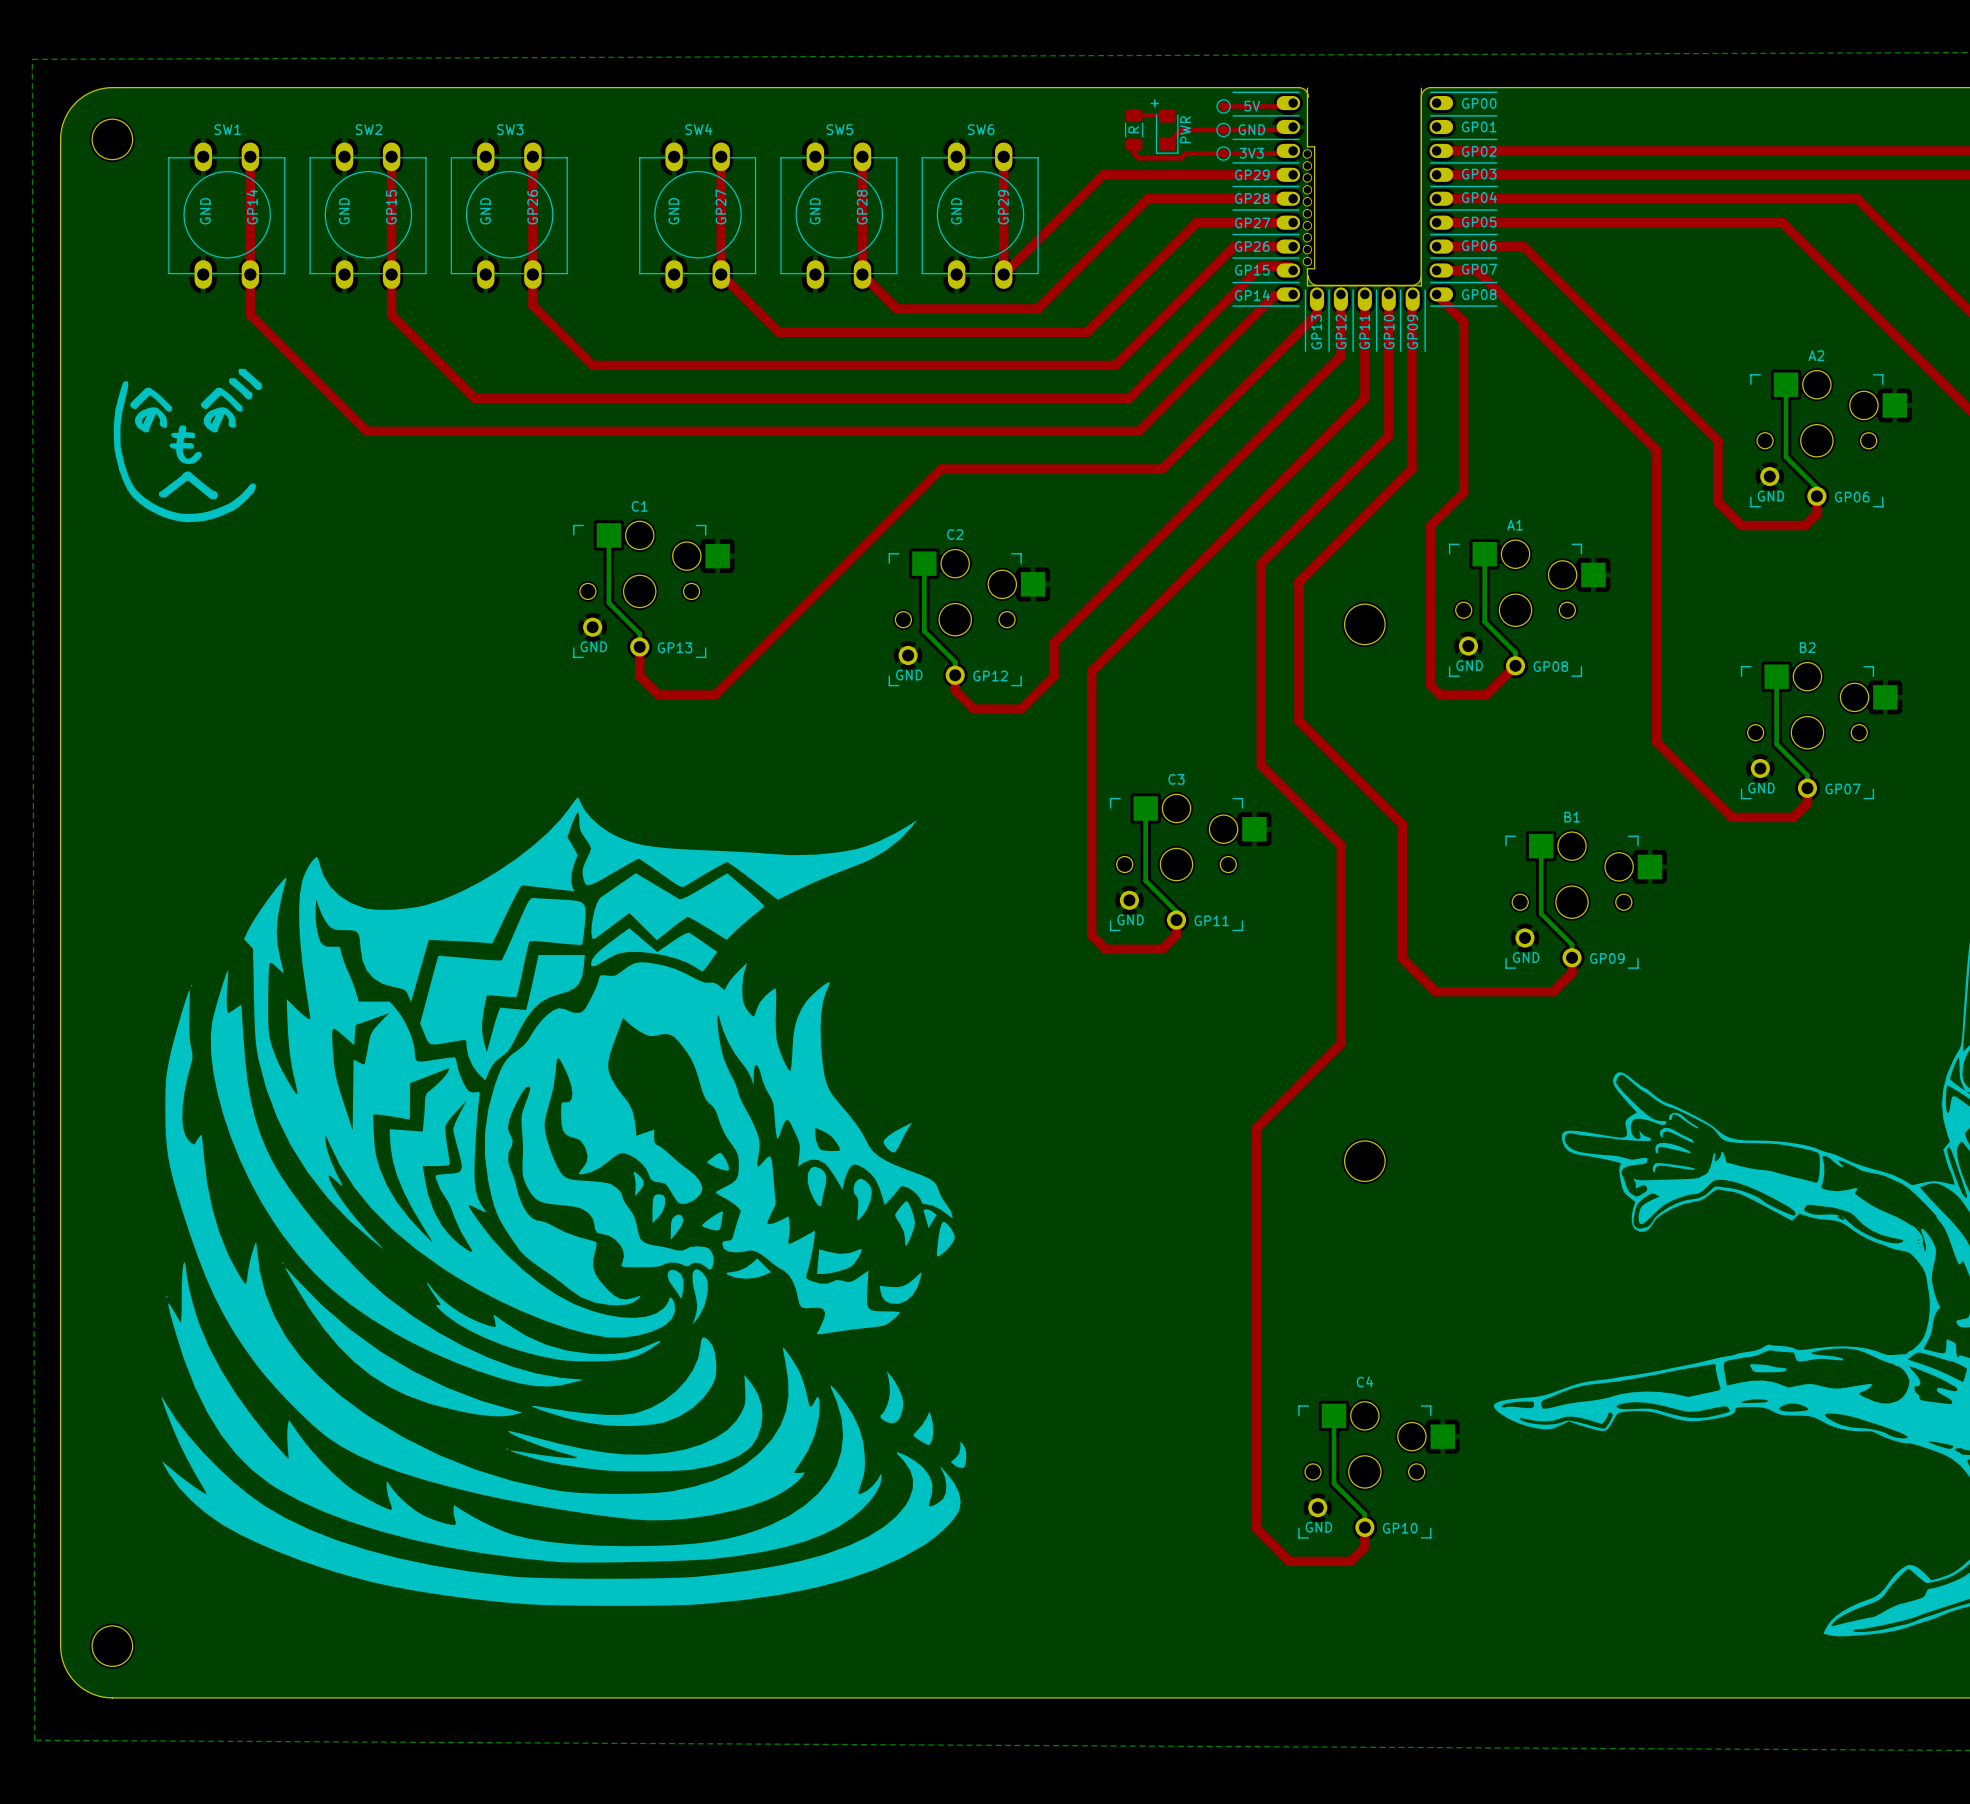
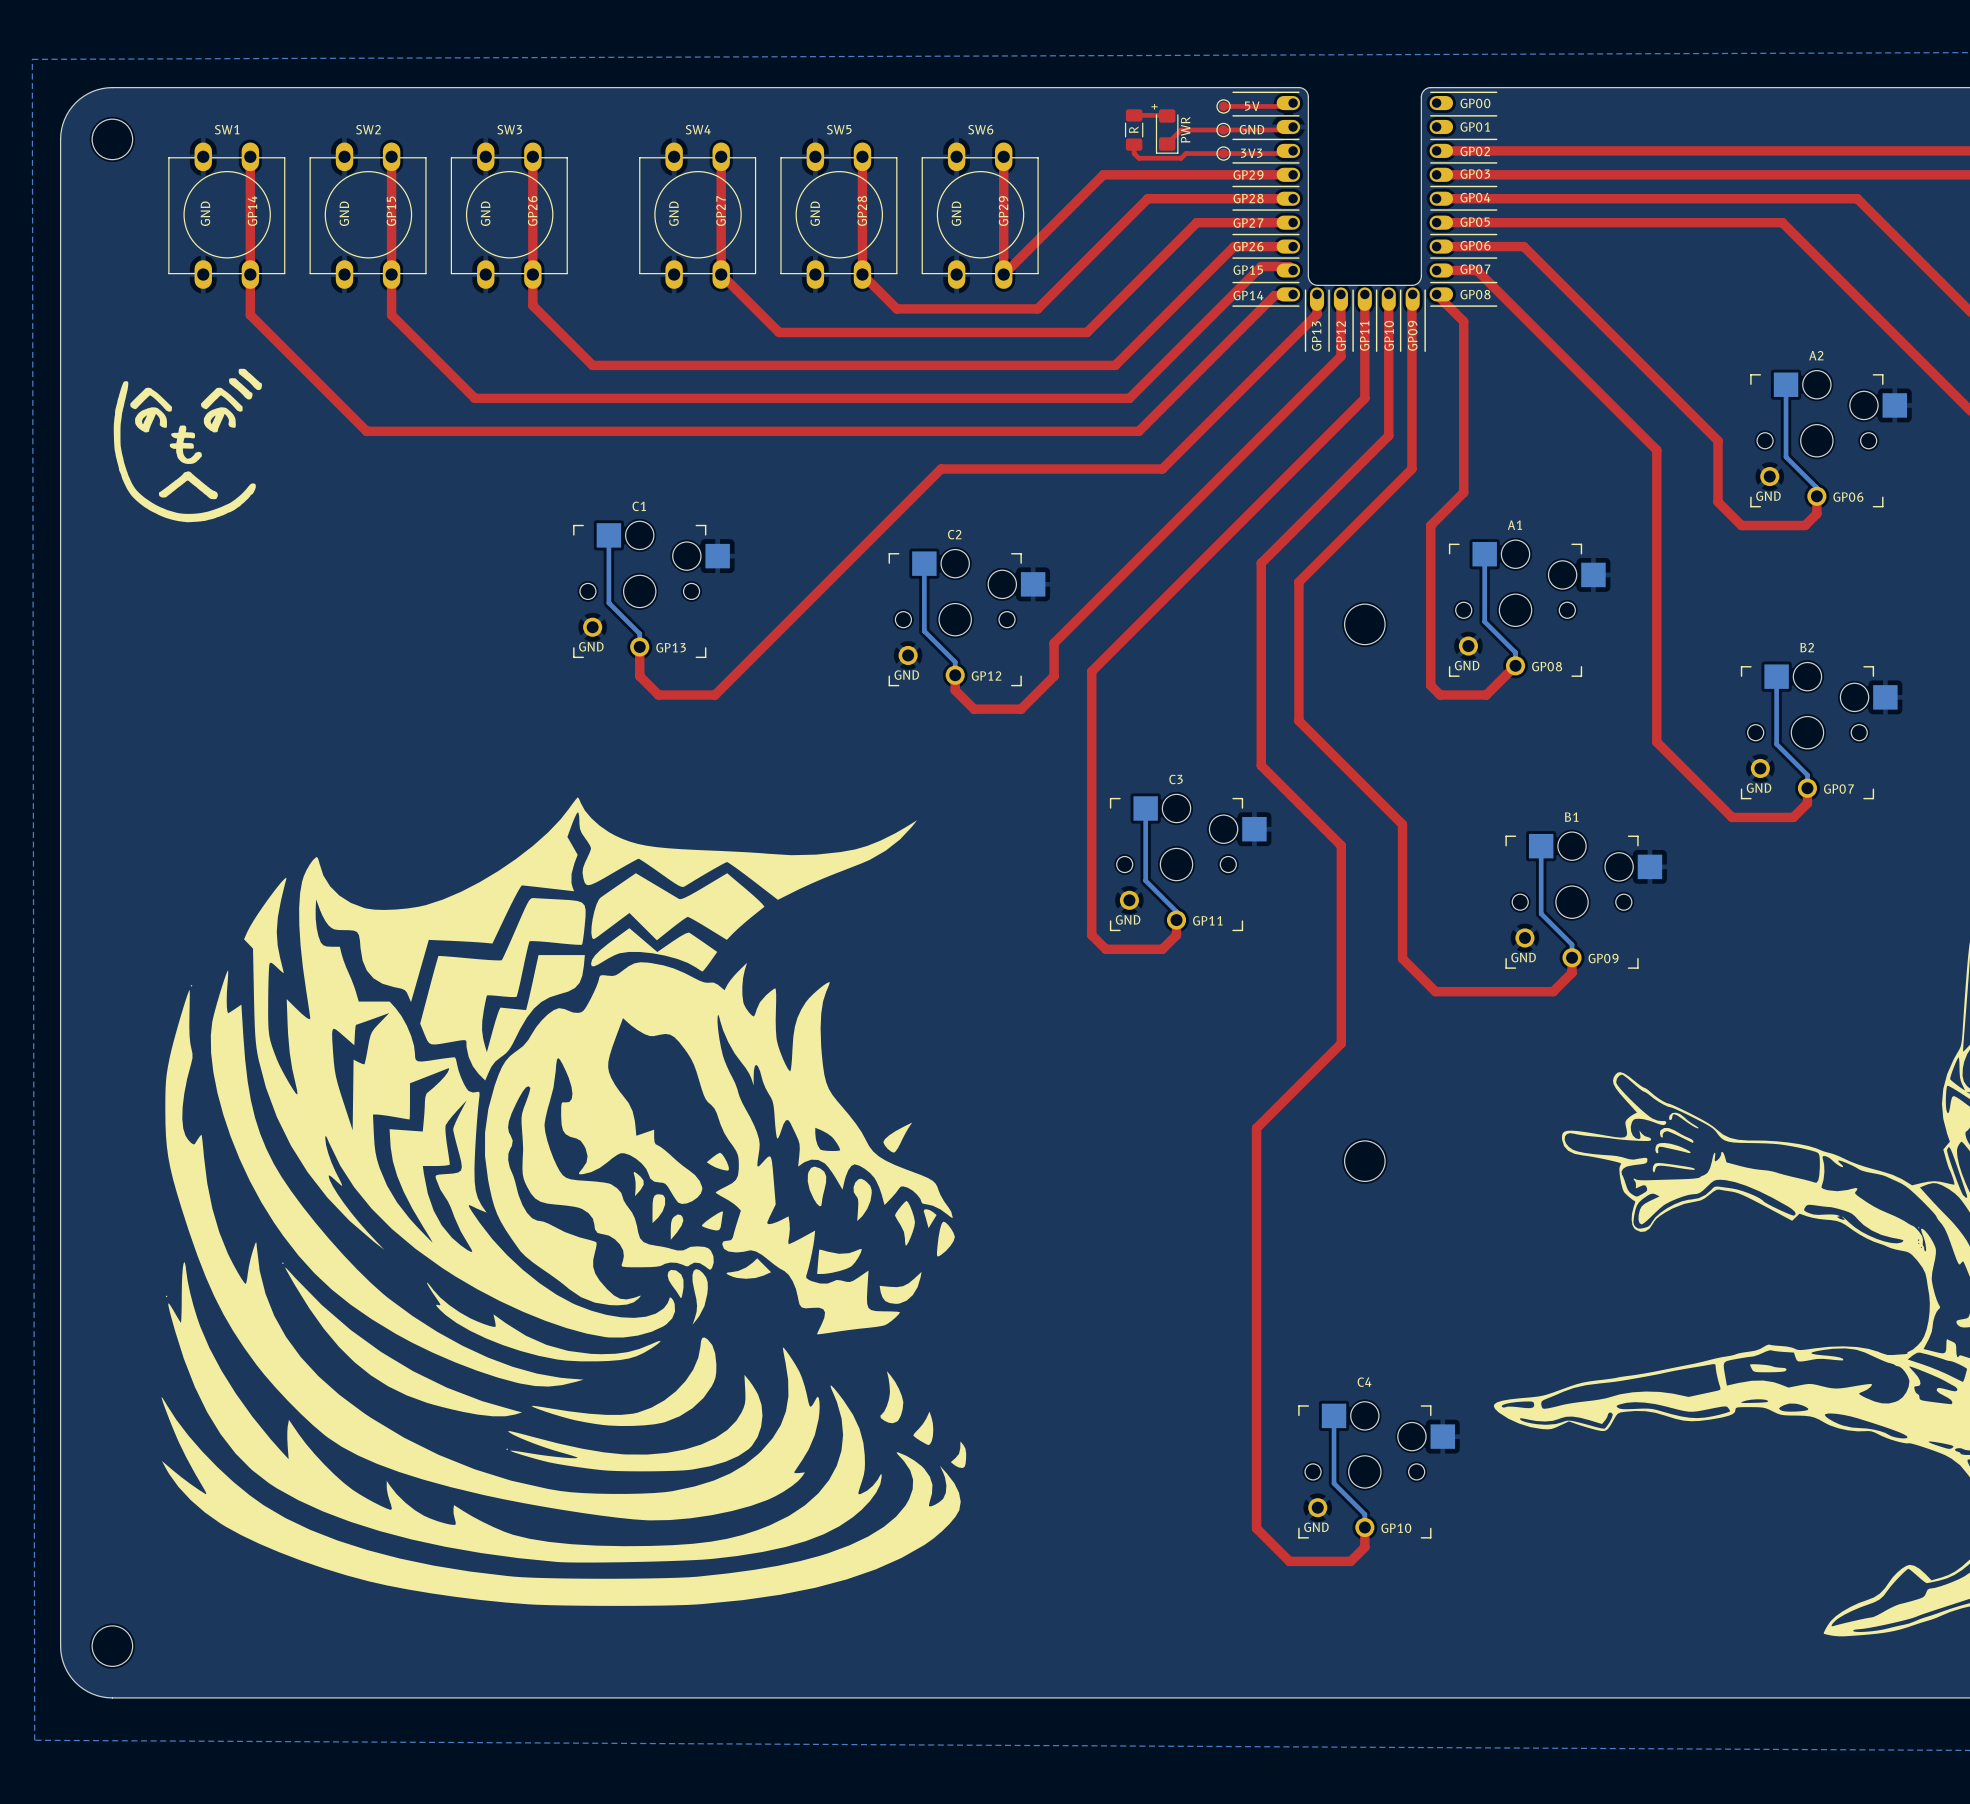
part footprint: [1276, 87, 1454, 311] -> [1276, 96, 1454, 311]
board edge: none -> (1308, 97) (1308, 275)

